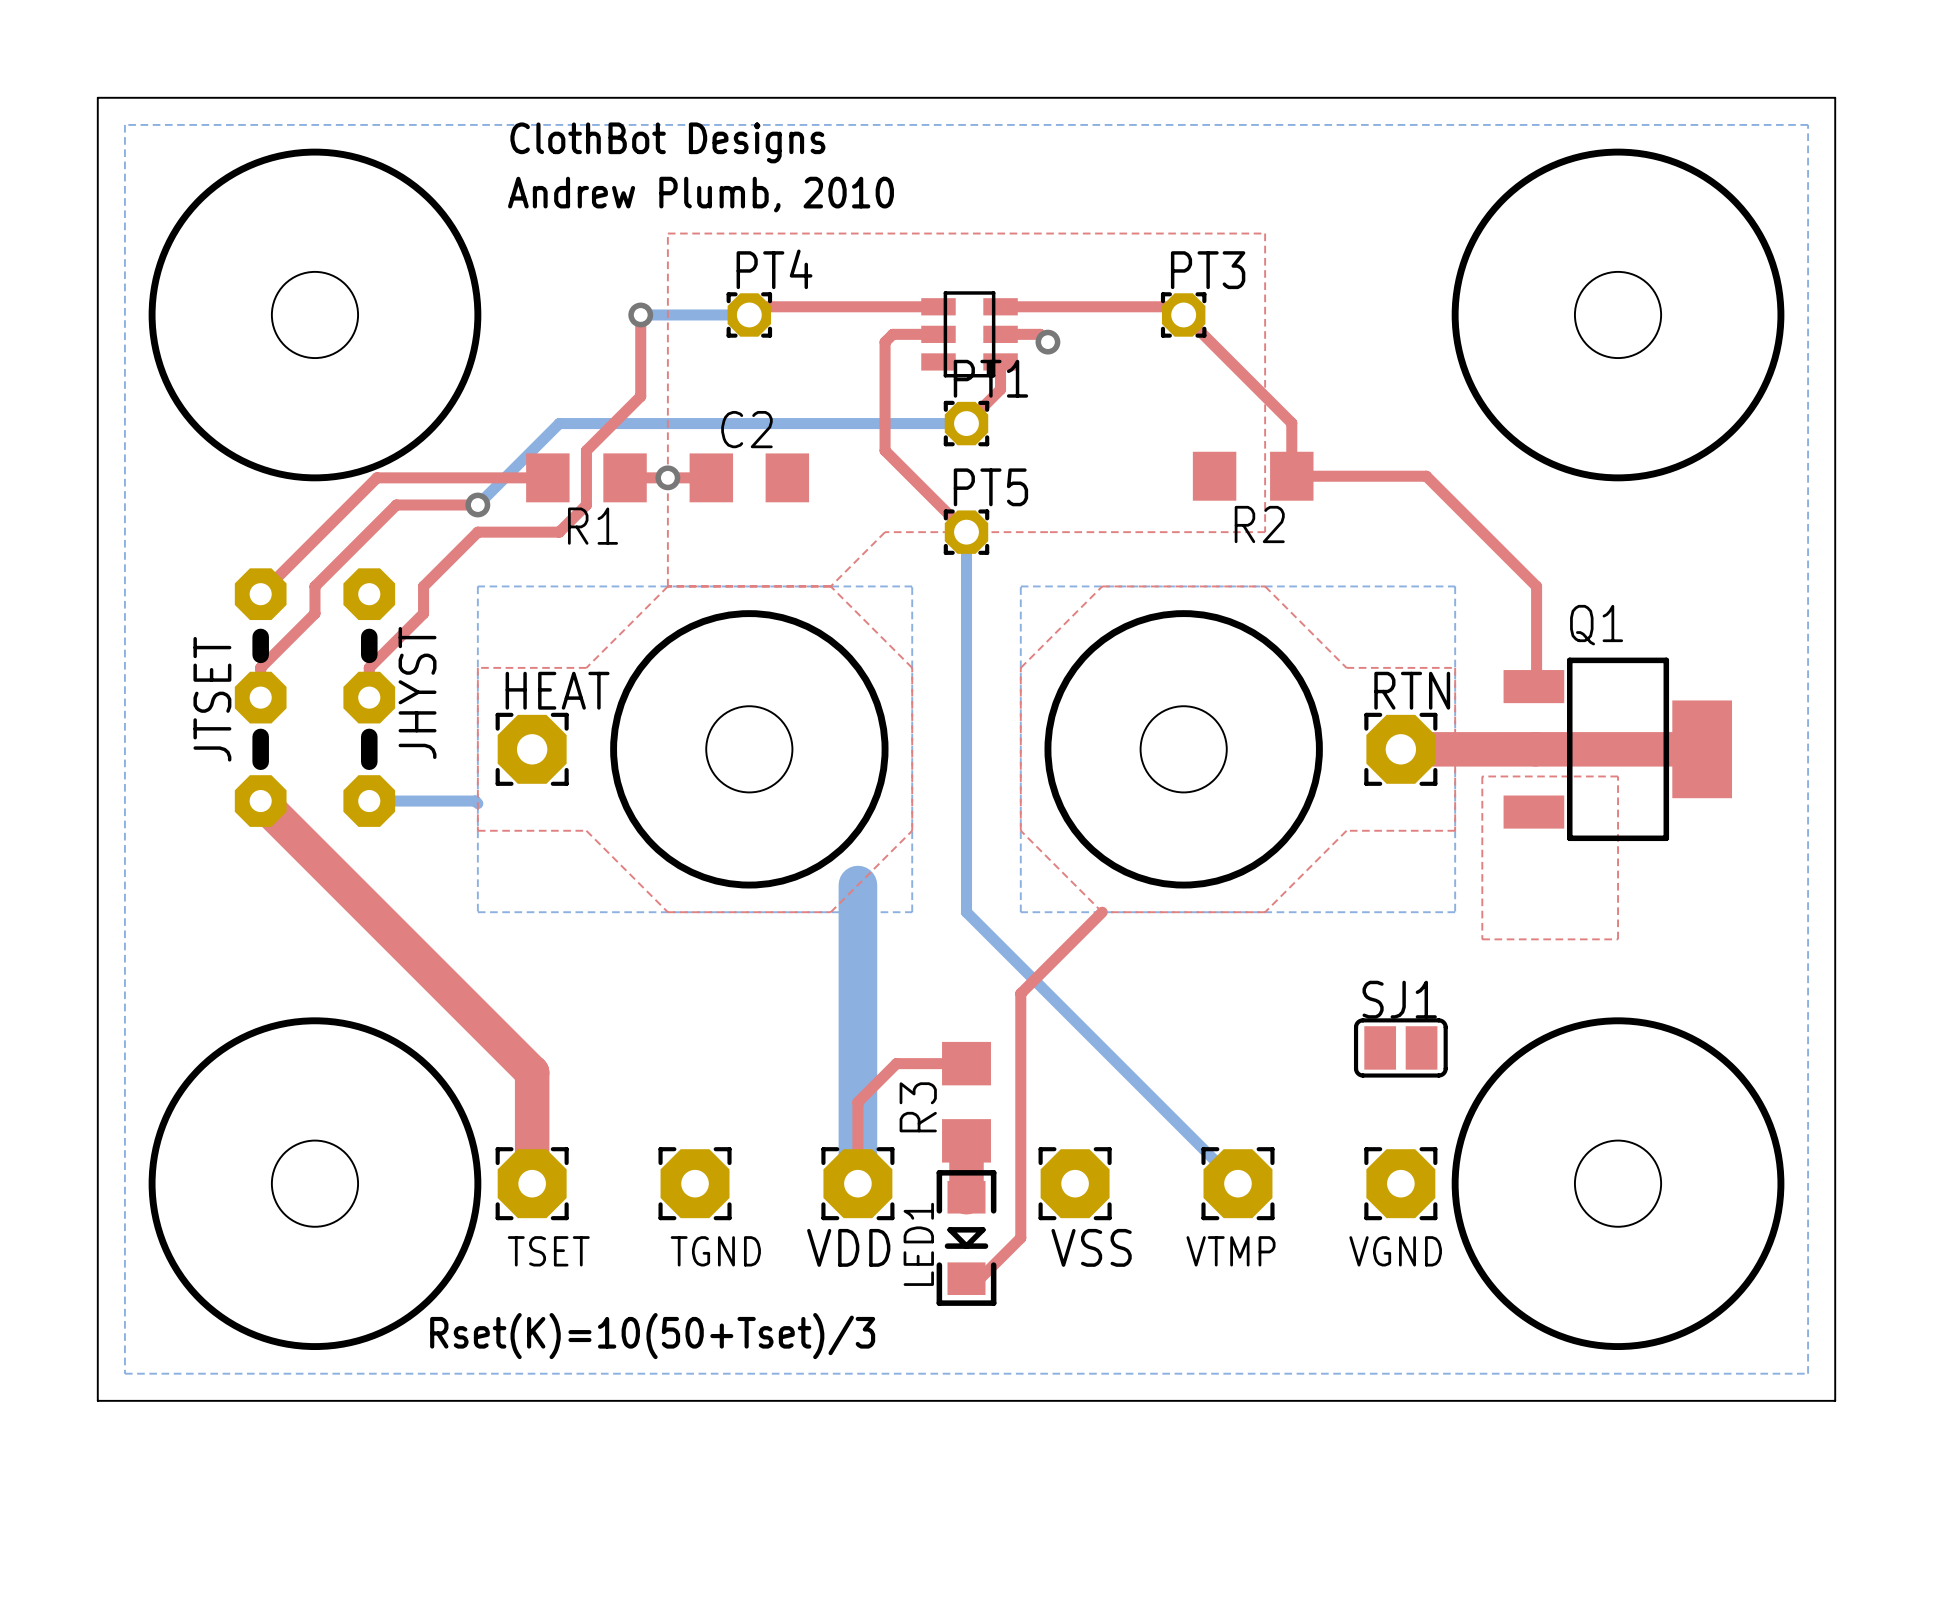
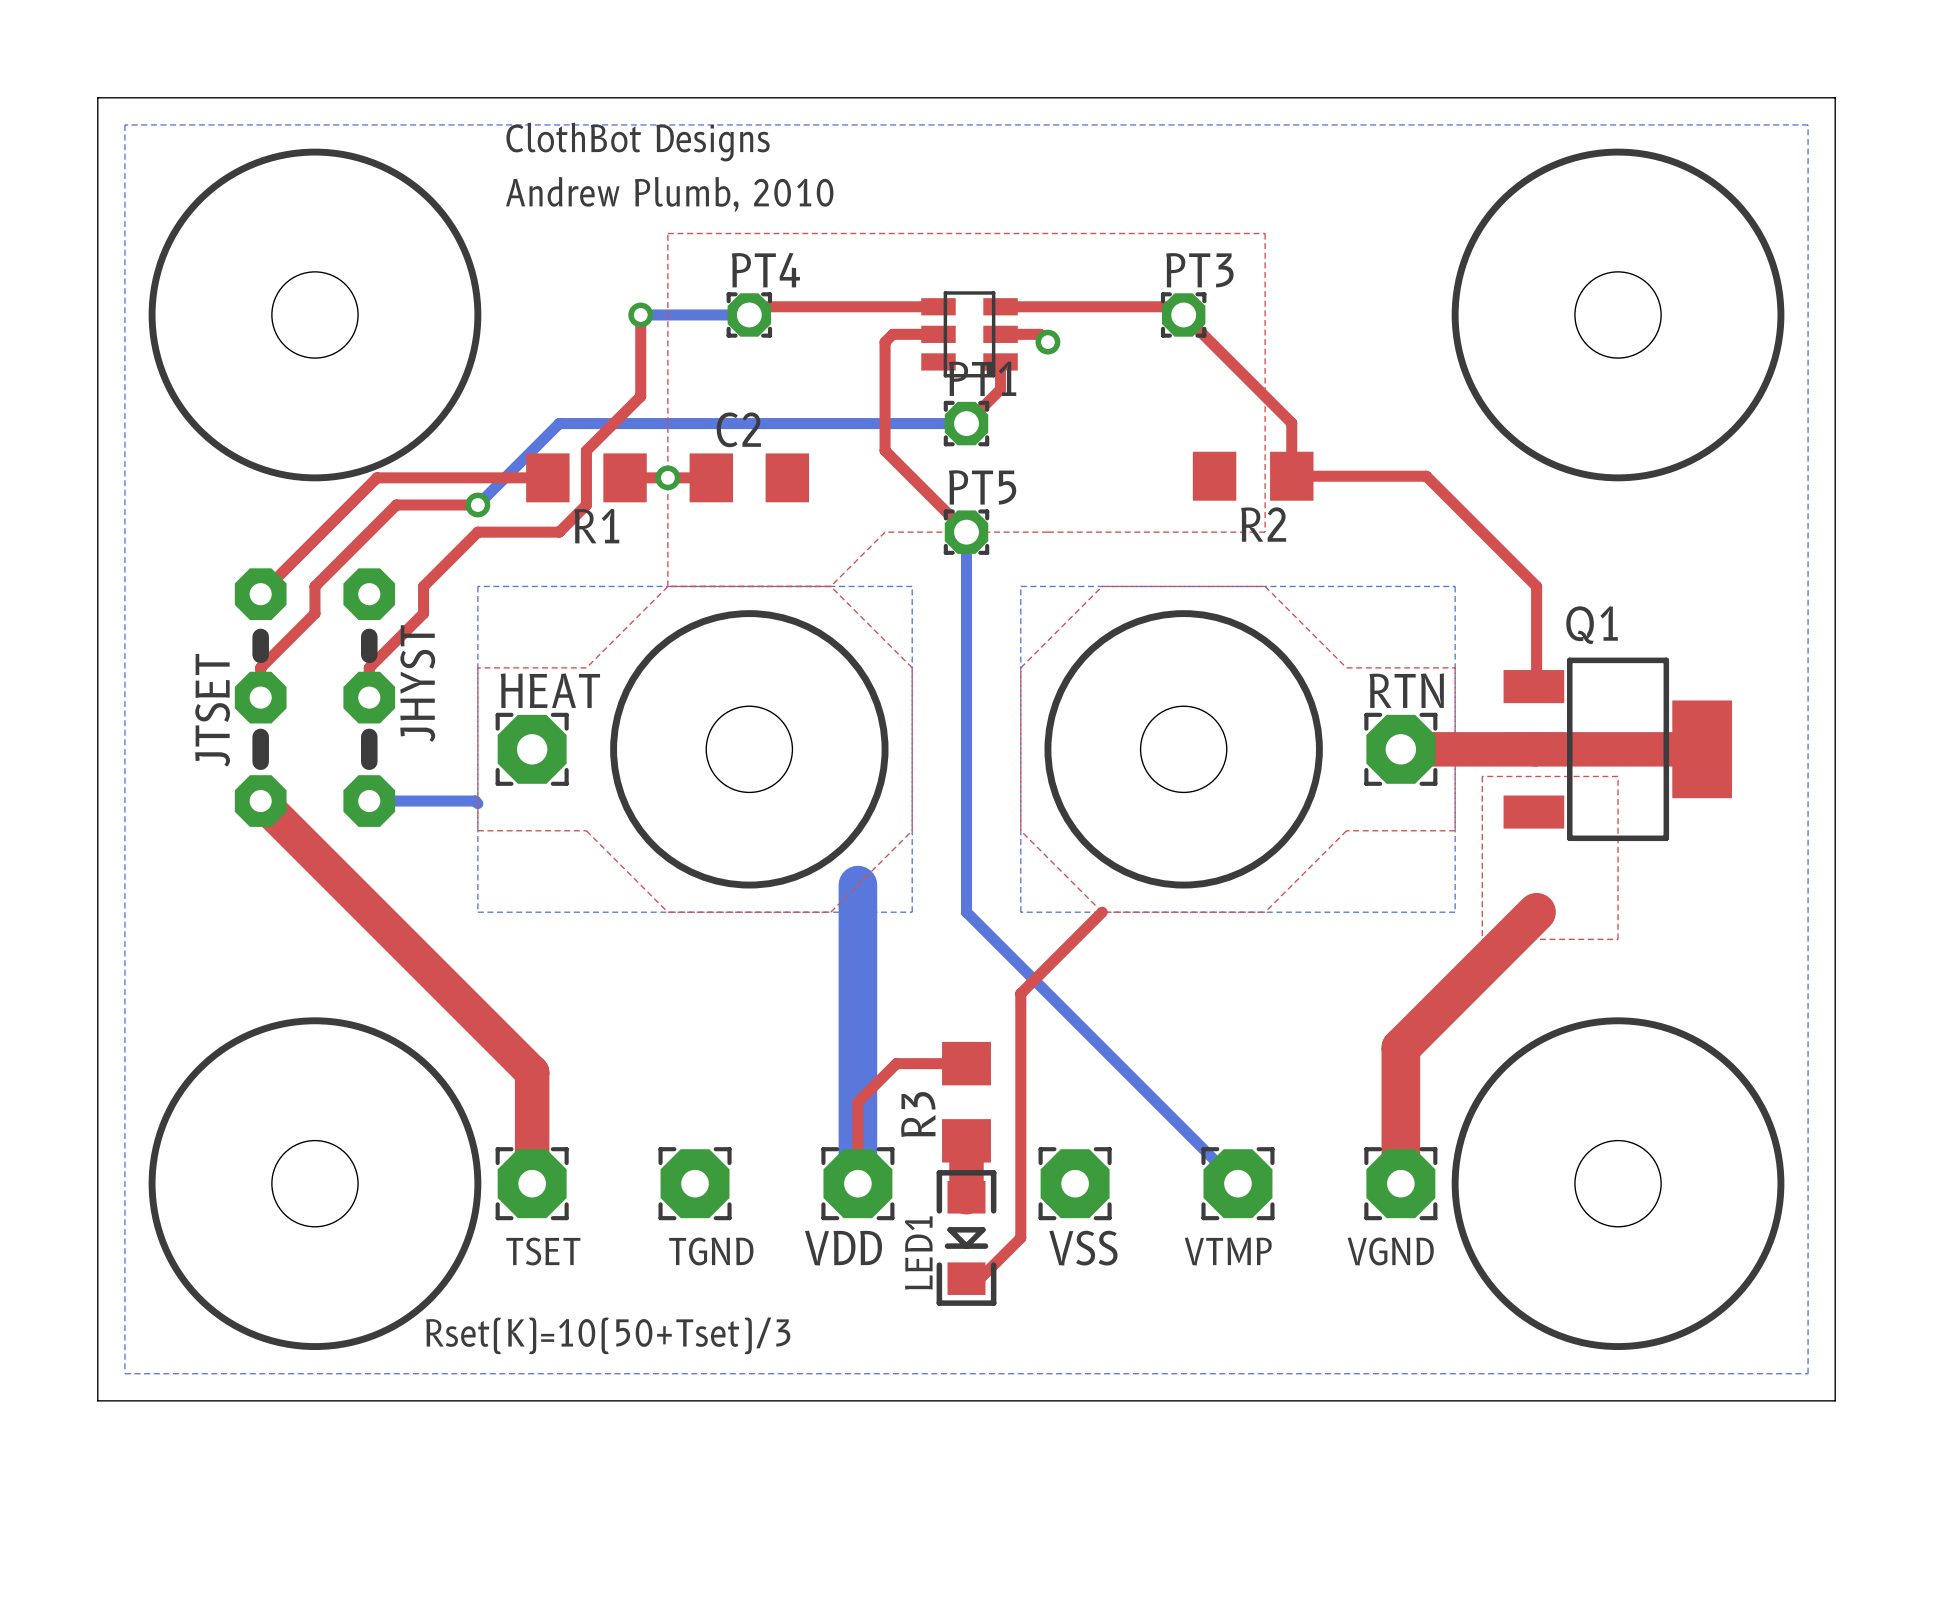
top track: none -> (1536, 912) (1400, 1047) (1400, 1183)
SJ1: (1400, 1047) -> none

